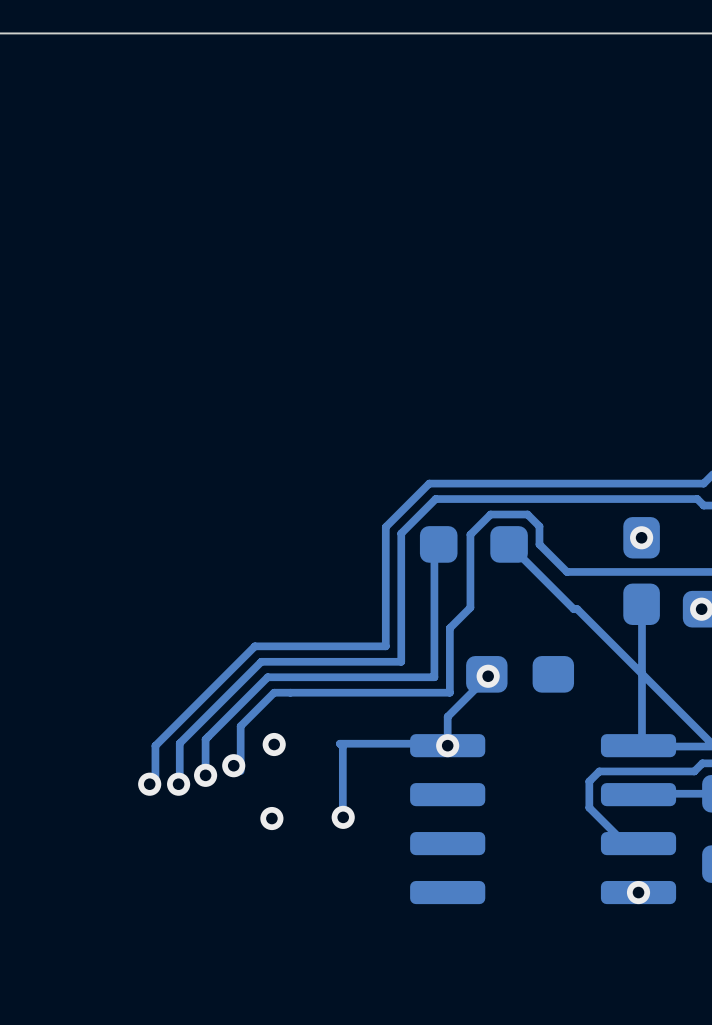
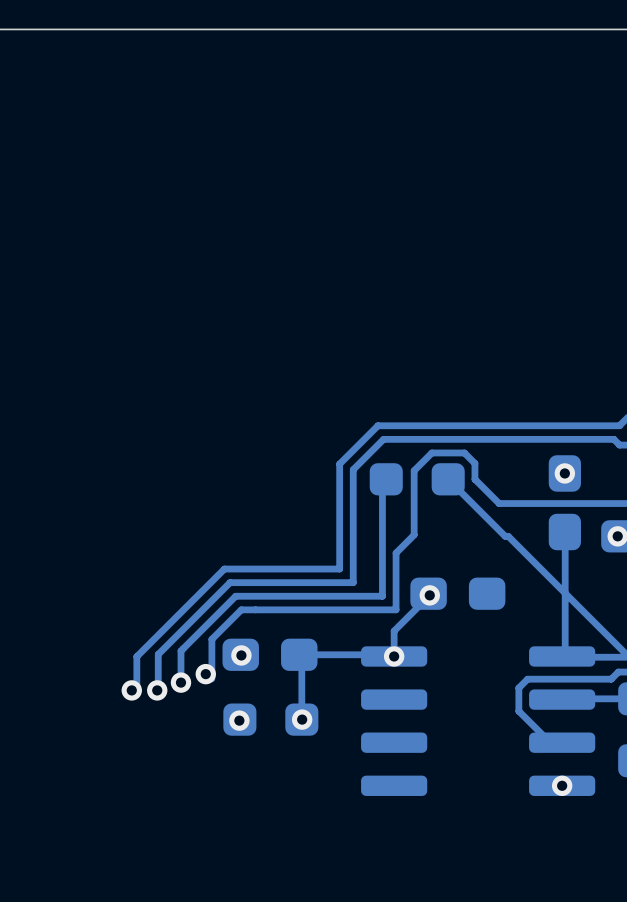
part: none -> (270, 654)
part: none -> (270, 719)

